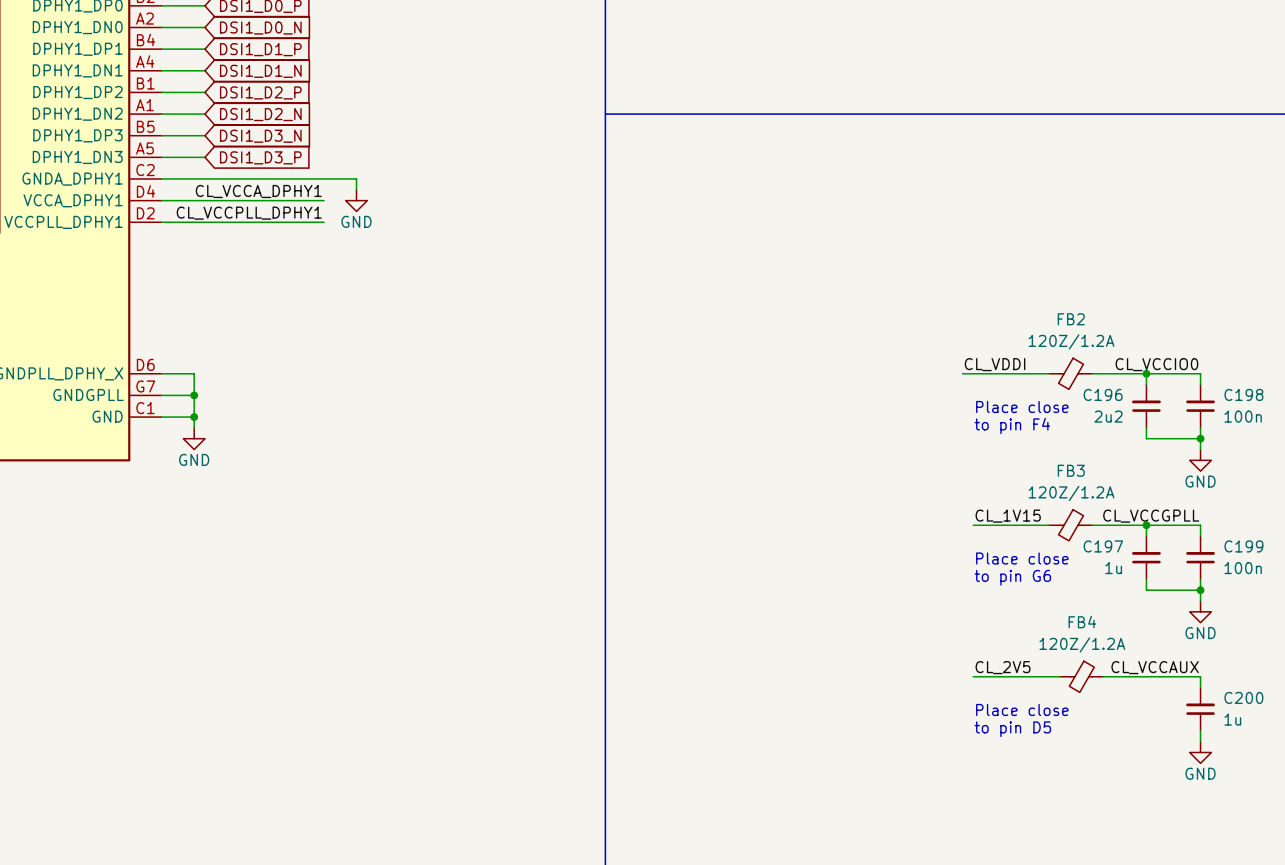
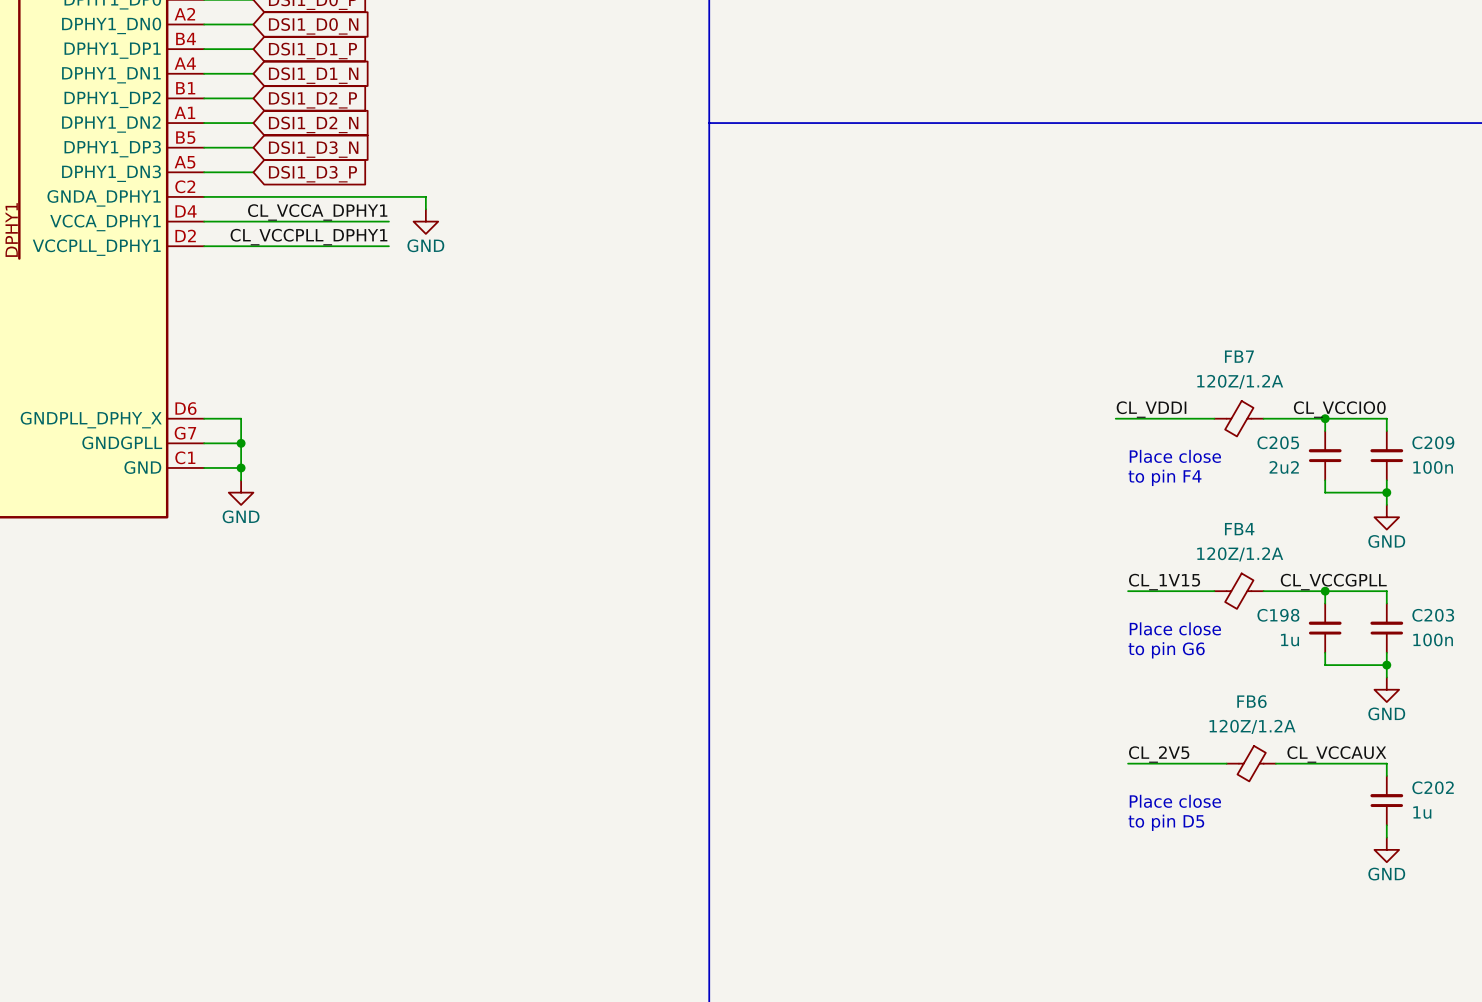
FB2 name: FB2 (1071, 319) -> FB7 (1239, 356)
C196 name: C196 (1103, 394) -> C205 (1278, 442)
C198 name: C198 (1243, 394) -> C209 (1433, 442)
FB3 name: FB3 (1071, 470) -> FB4 (1239, 529)
C197 name: C197 (1103, 546) -> C198 (1278, 615)
C199 name: C199 (1243, 546) -> C203 (1433, 615)
FB4 name: FB4 (1082, 621) -> FB6 (1251, 701)
C200 name: C200 (1243, 697) -> C202 (1433, 787)

